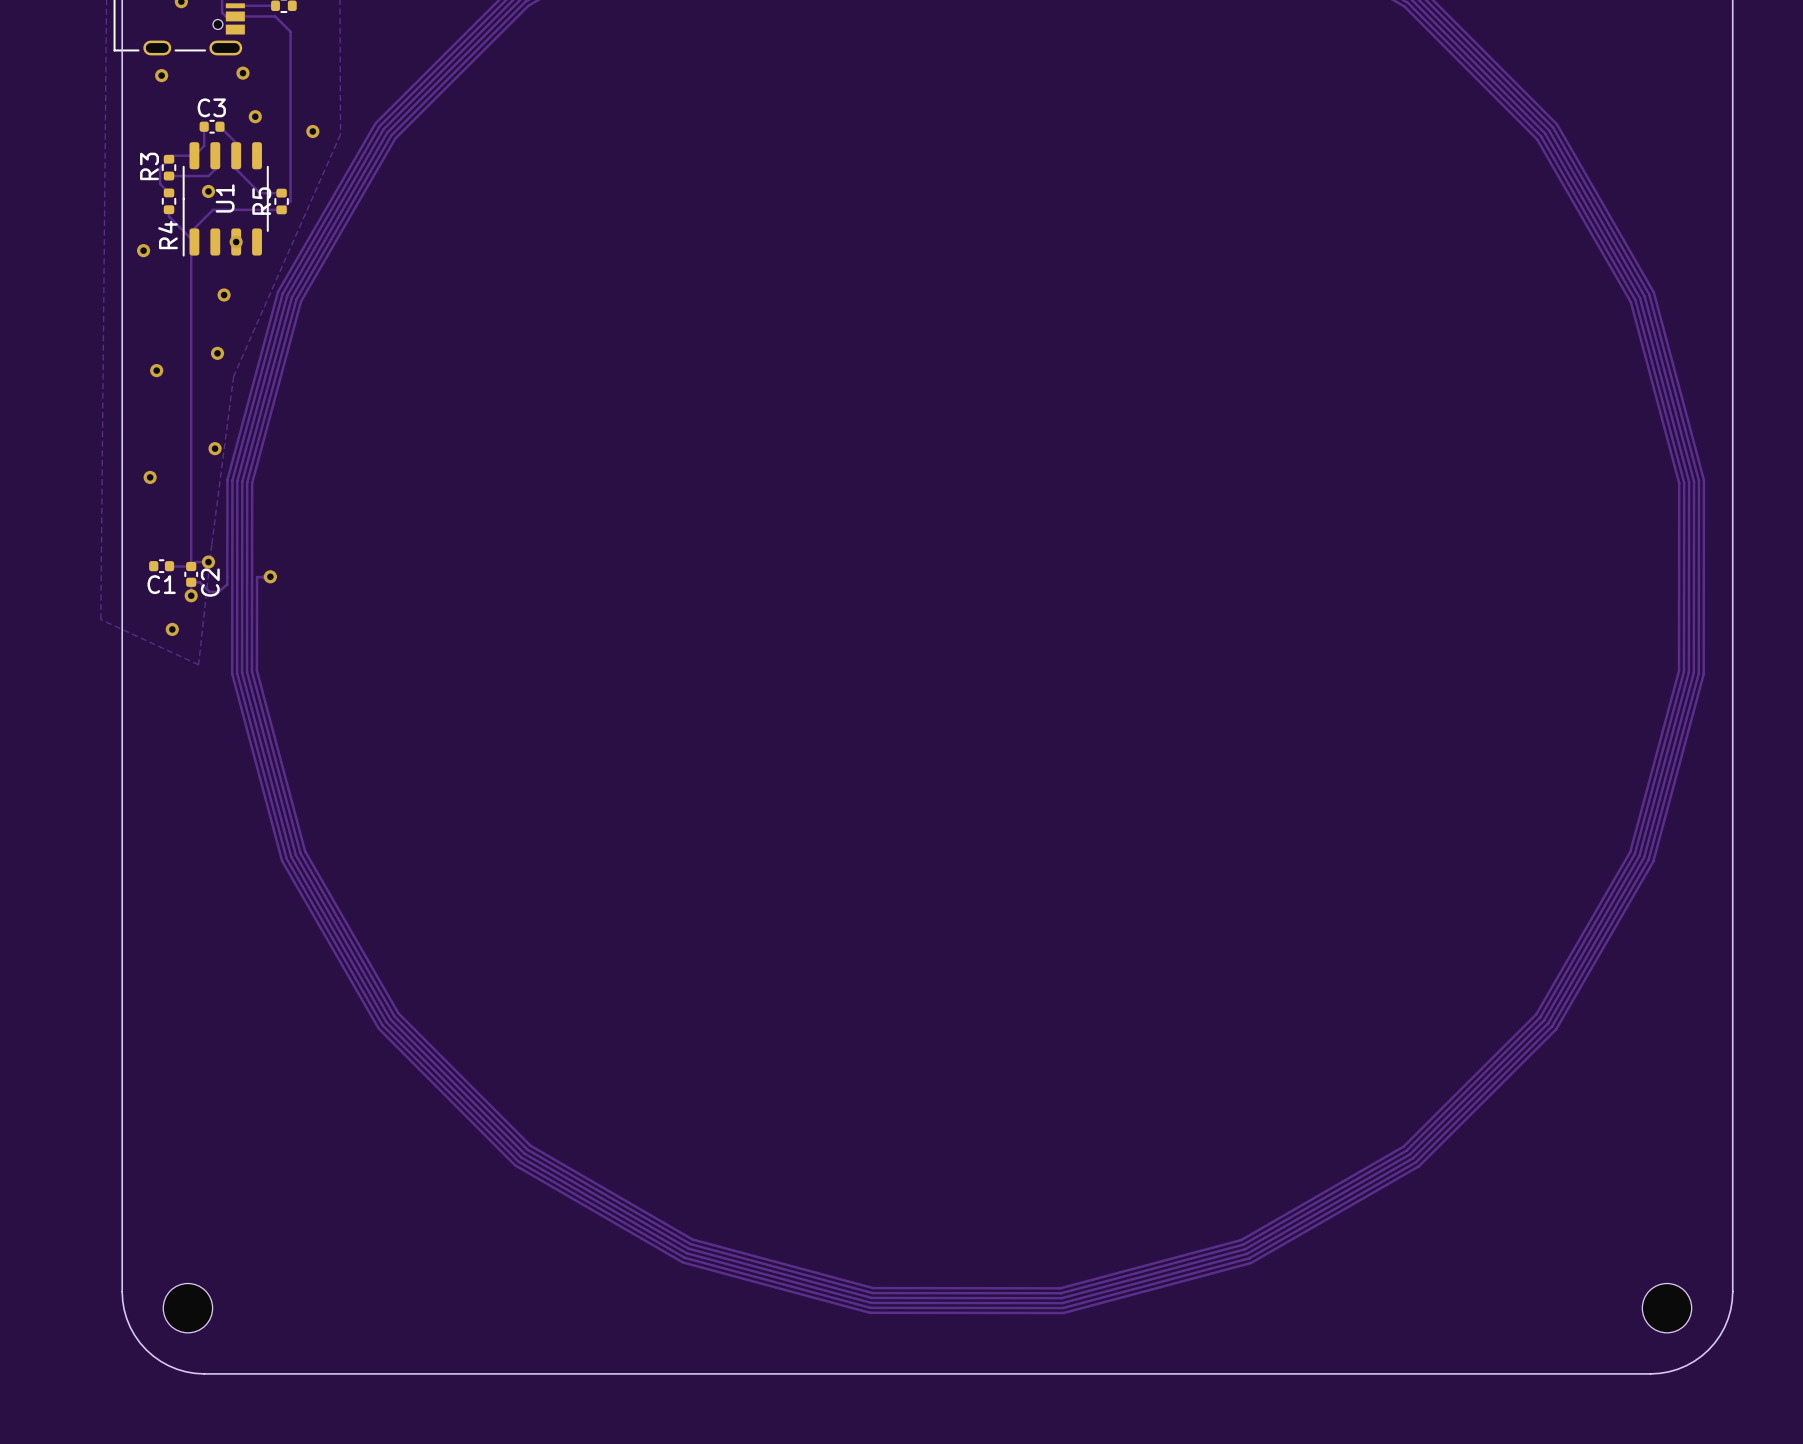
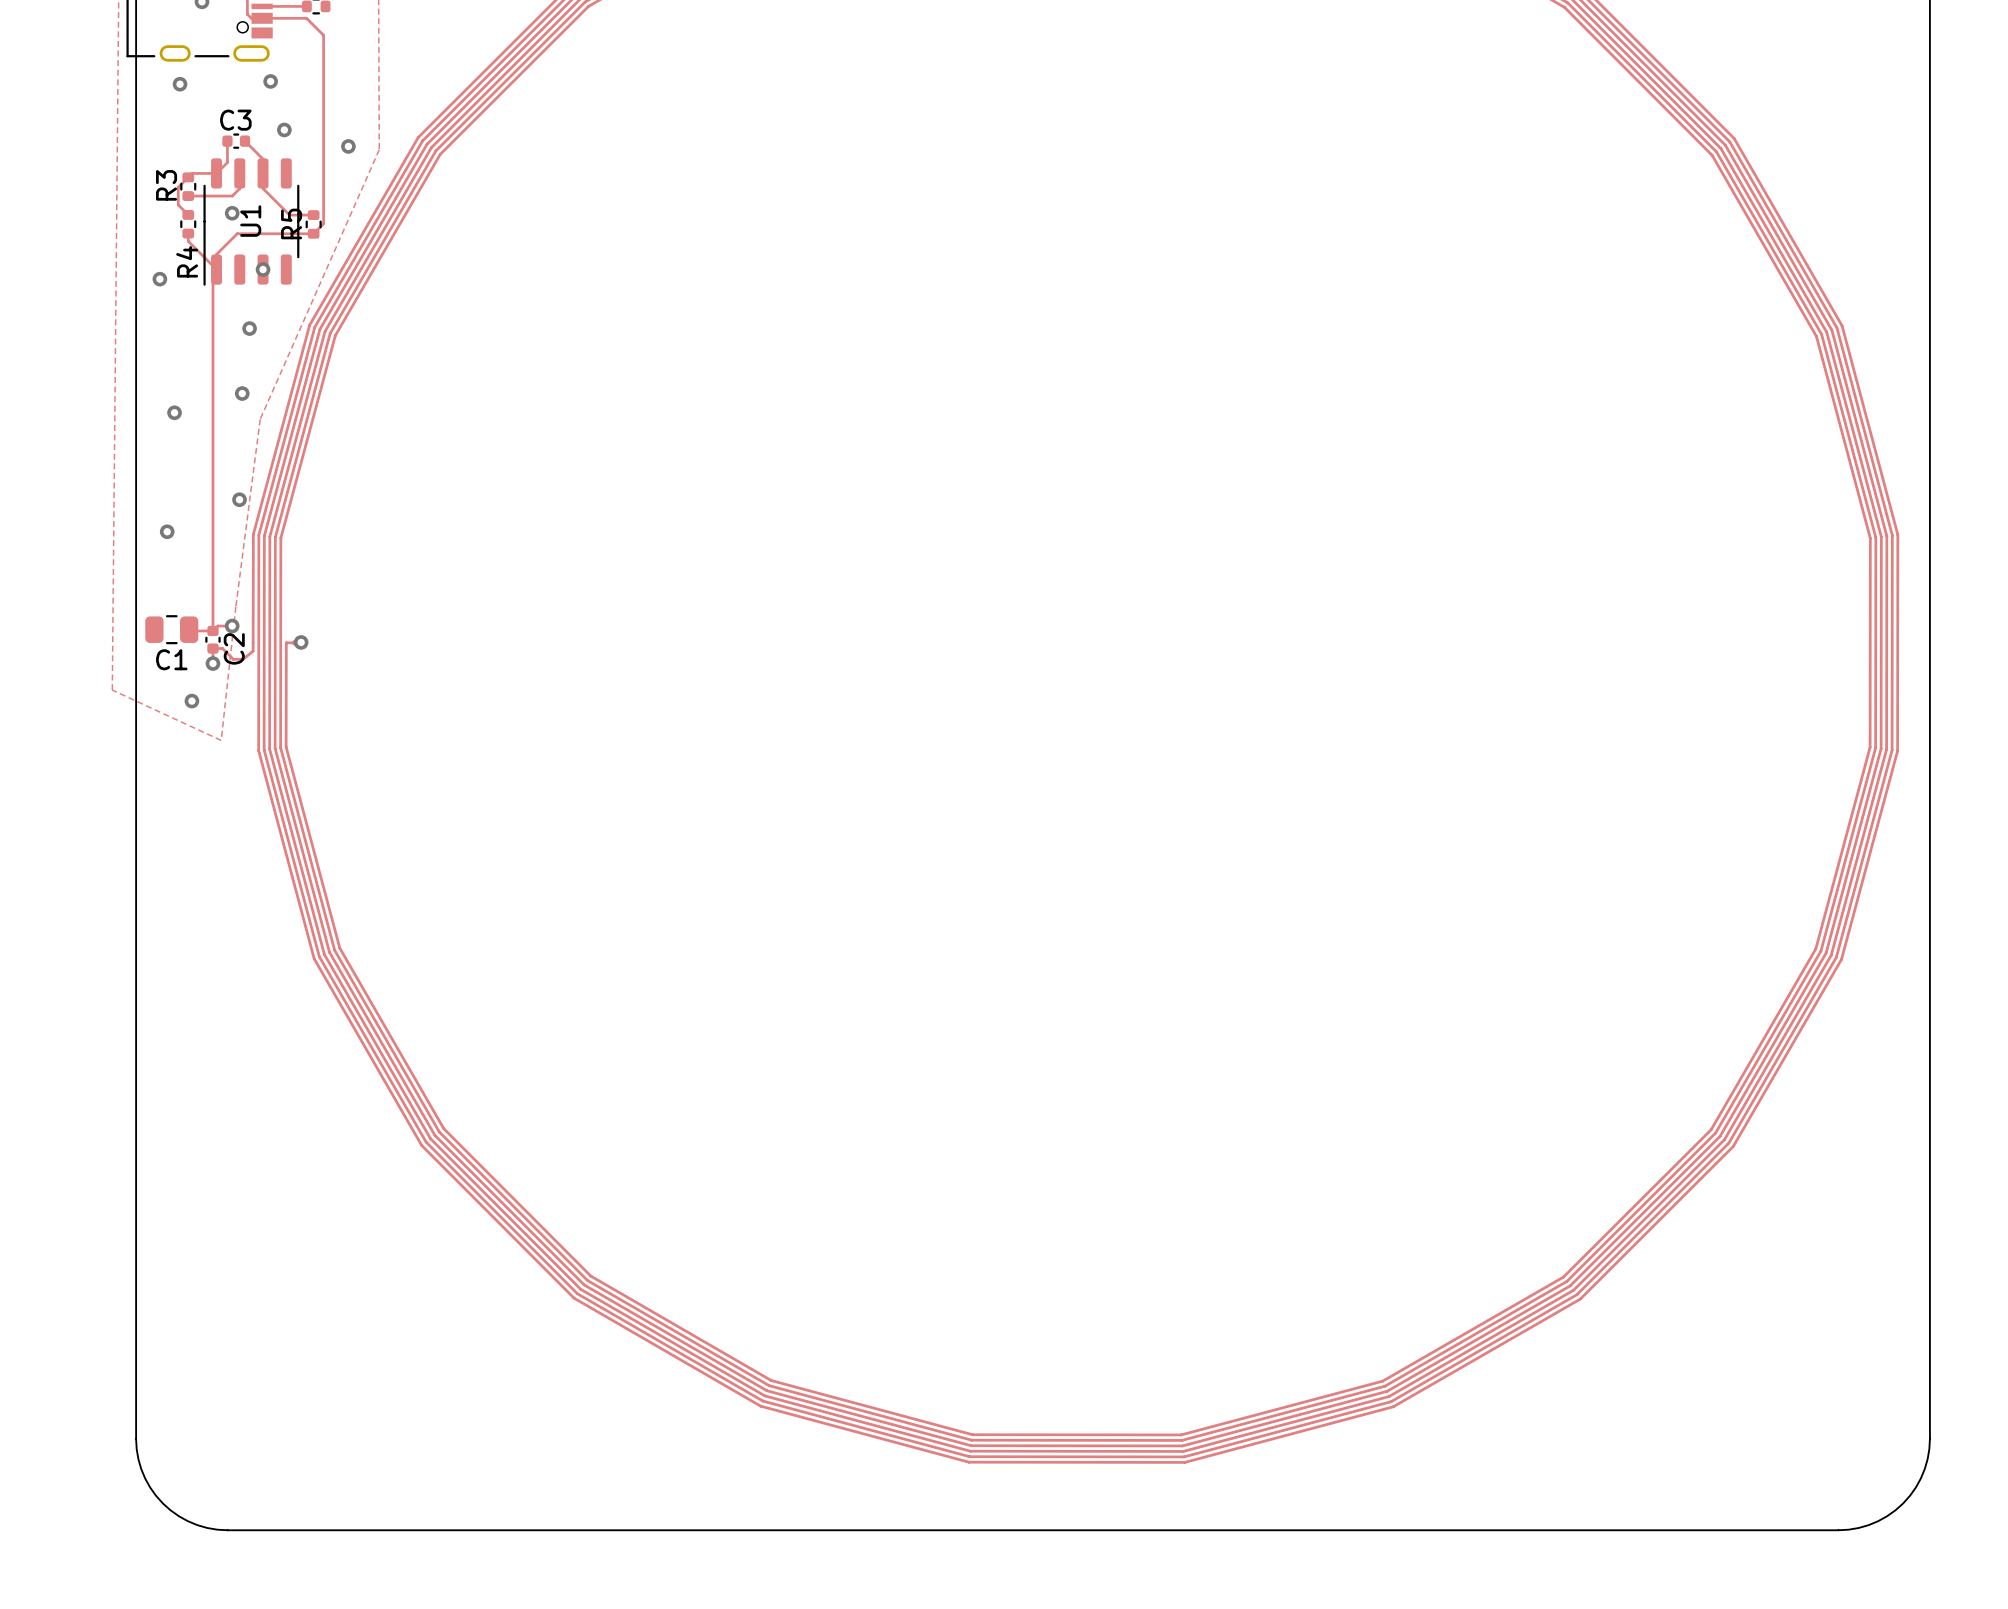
C1 footprint: [149, 559, 175, 574] -> [145, 615, 199, 645]
part: (187, 1308) -> none
part: (1667, 1308) -> none

